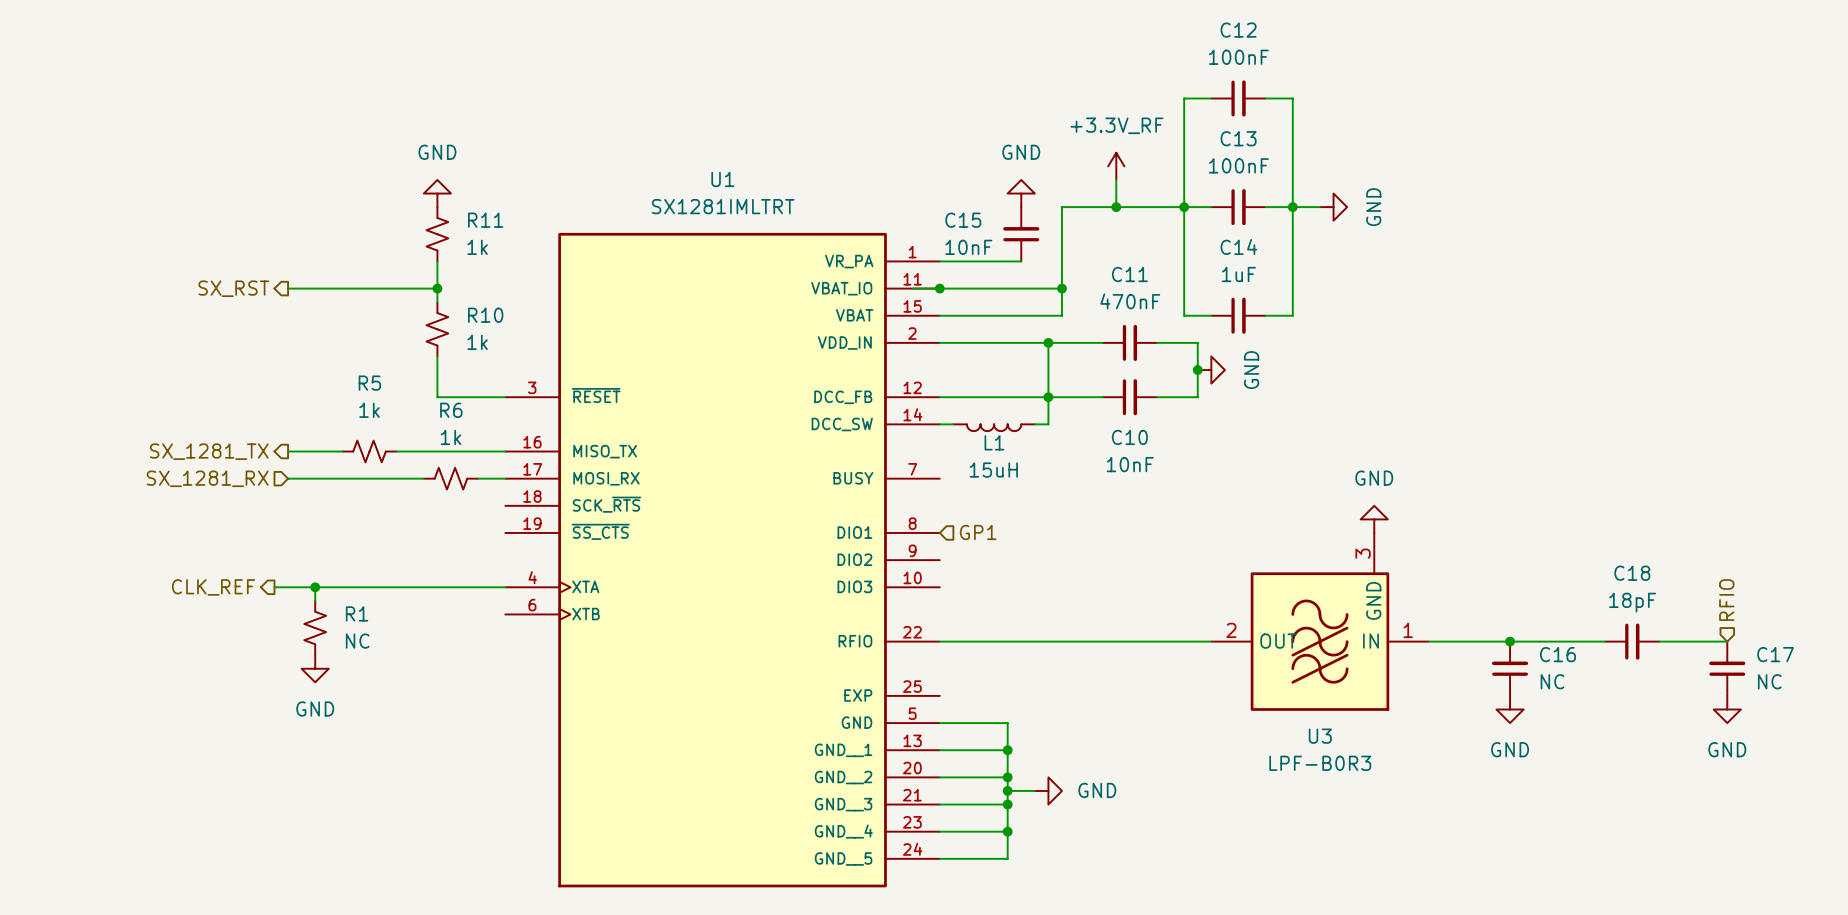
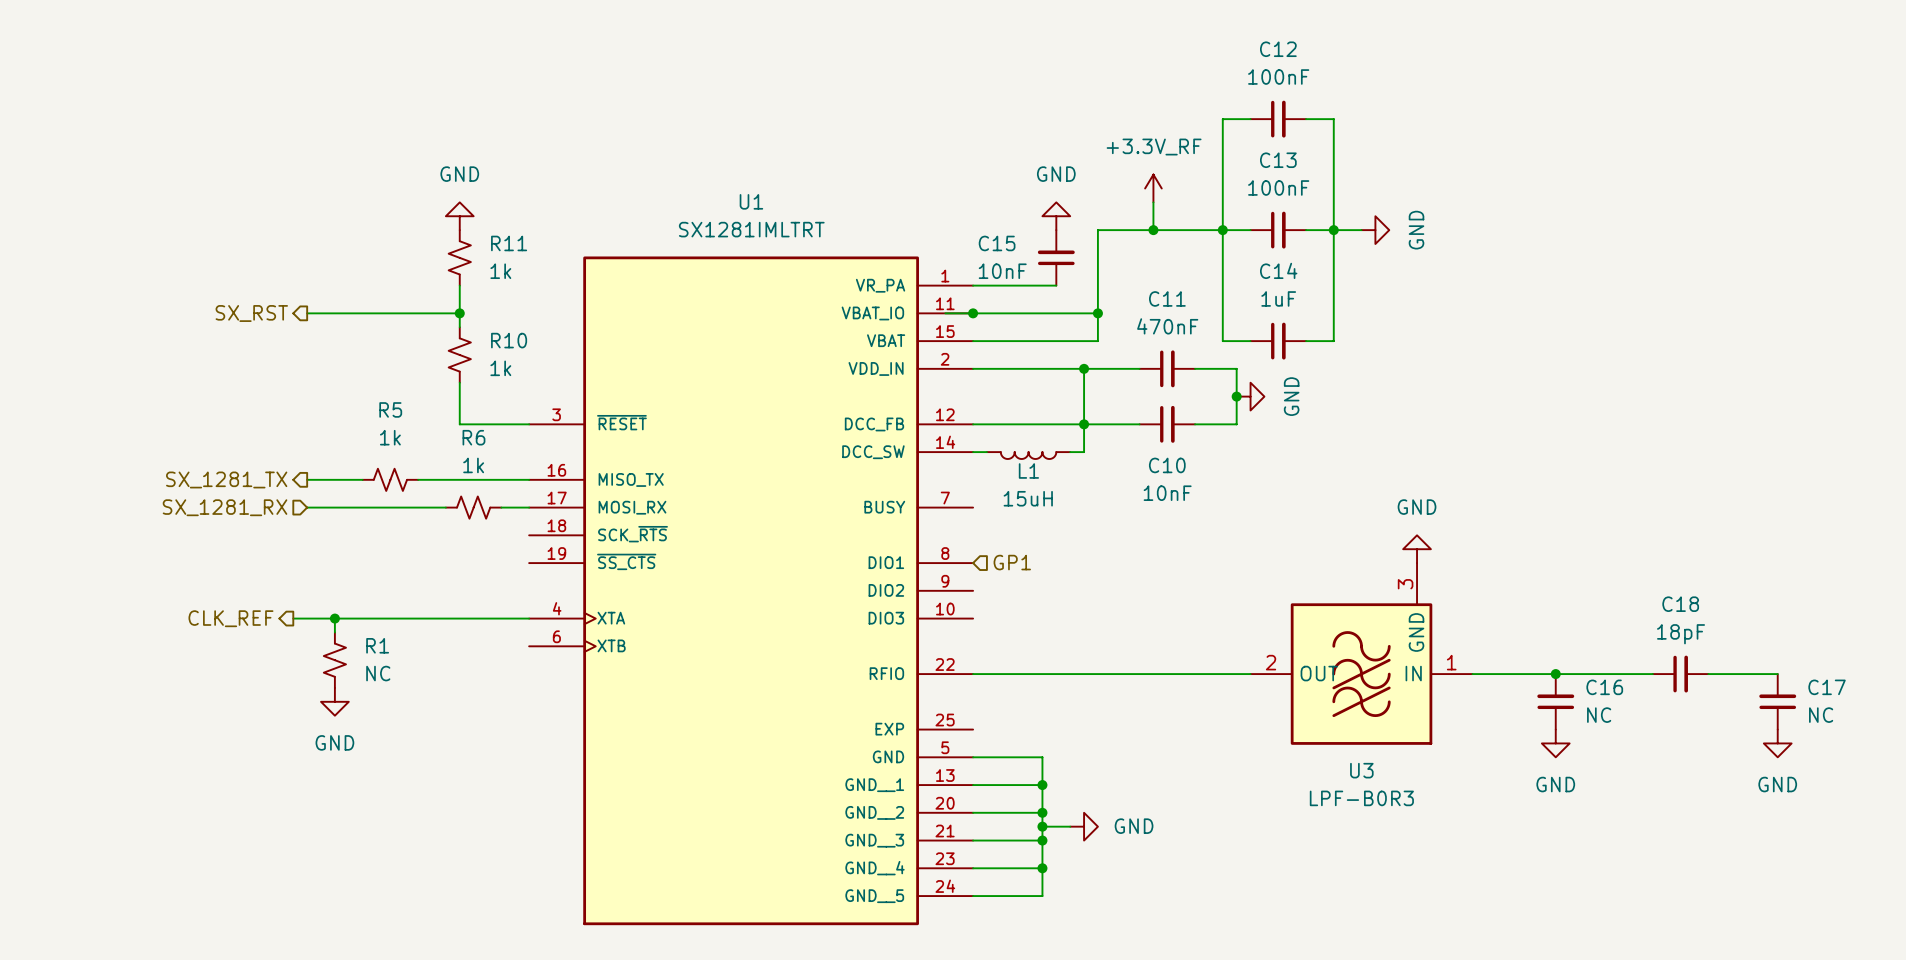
hierarchical label: RFIO (1726, 600) -> none

